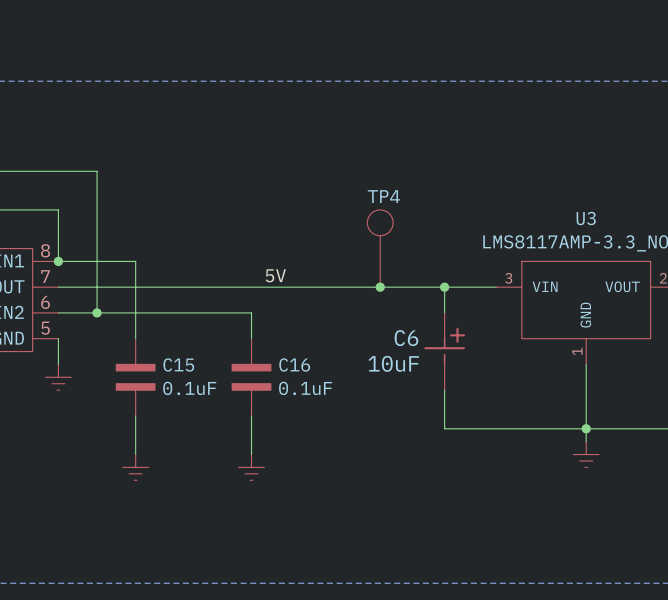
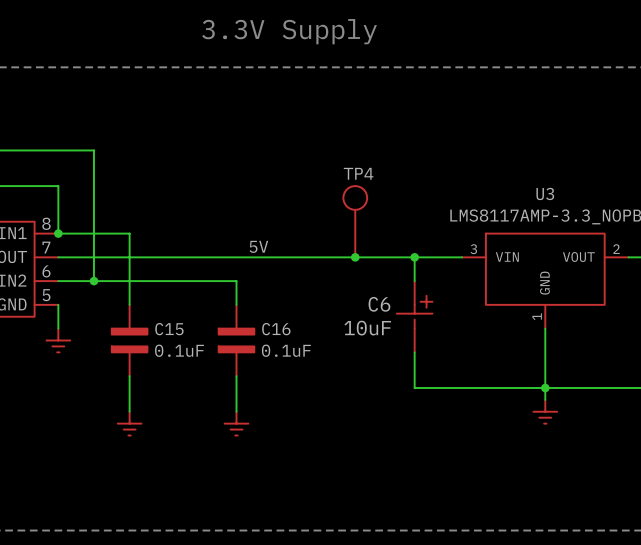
text: none -> 3.3V Supply (289, 31)

